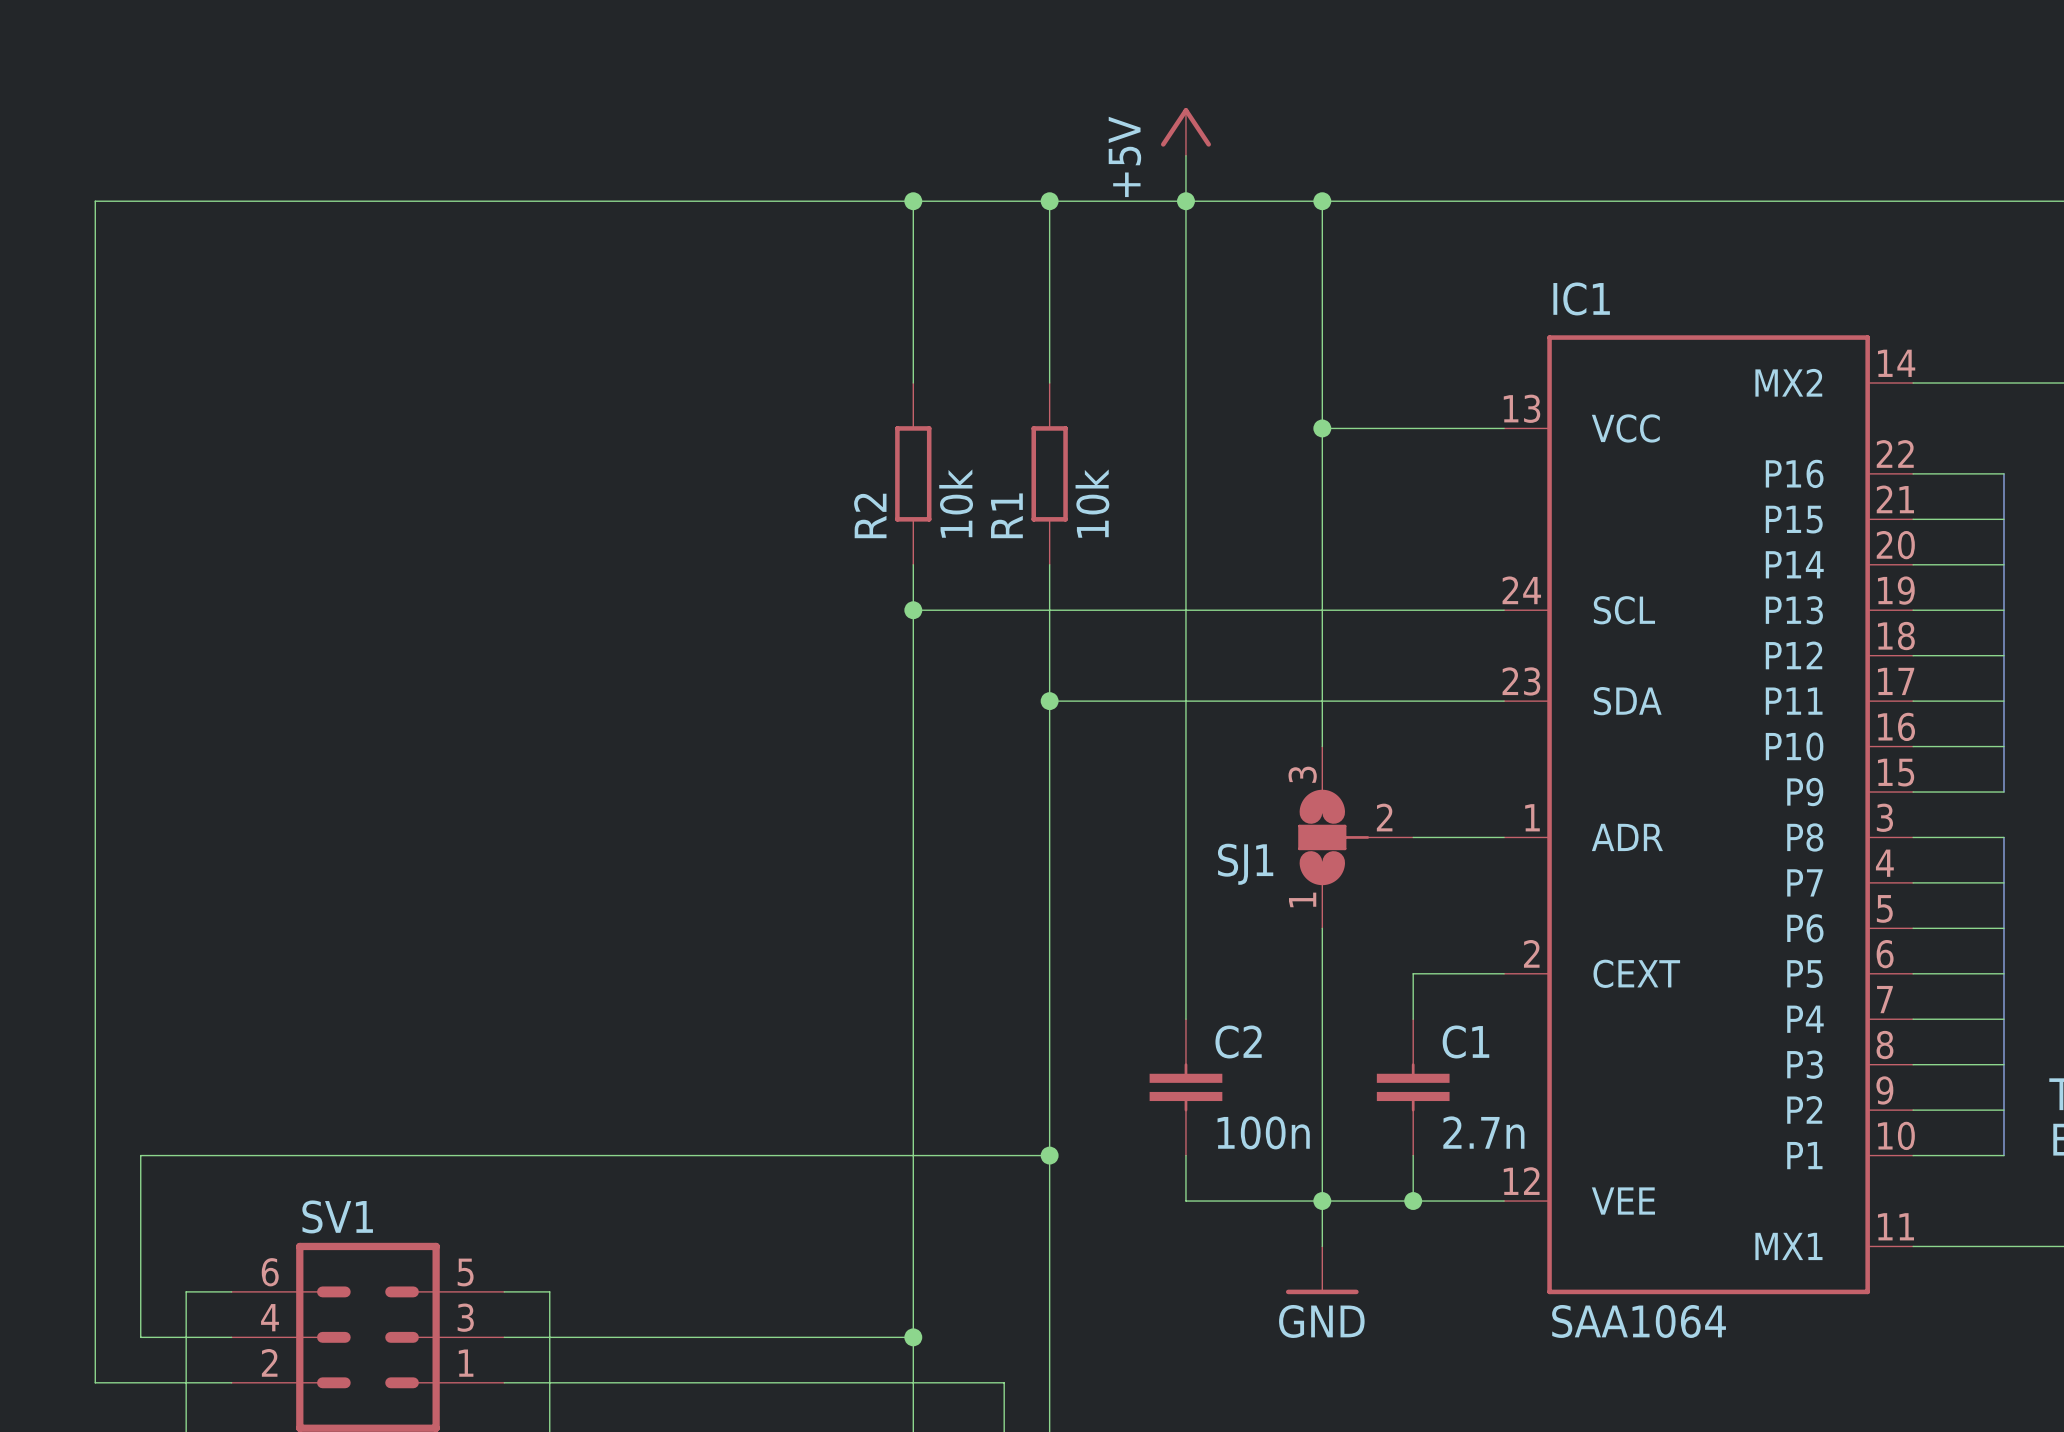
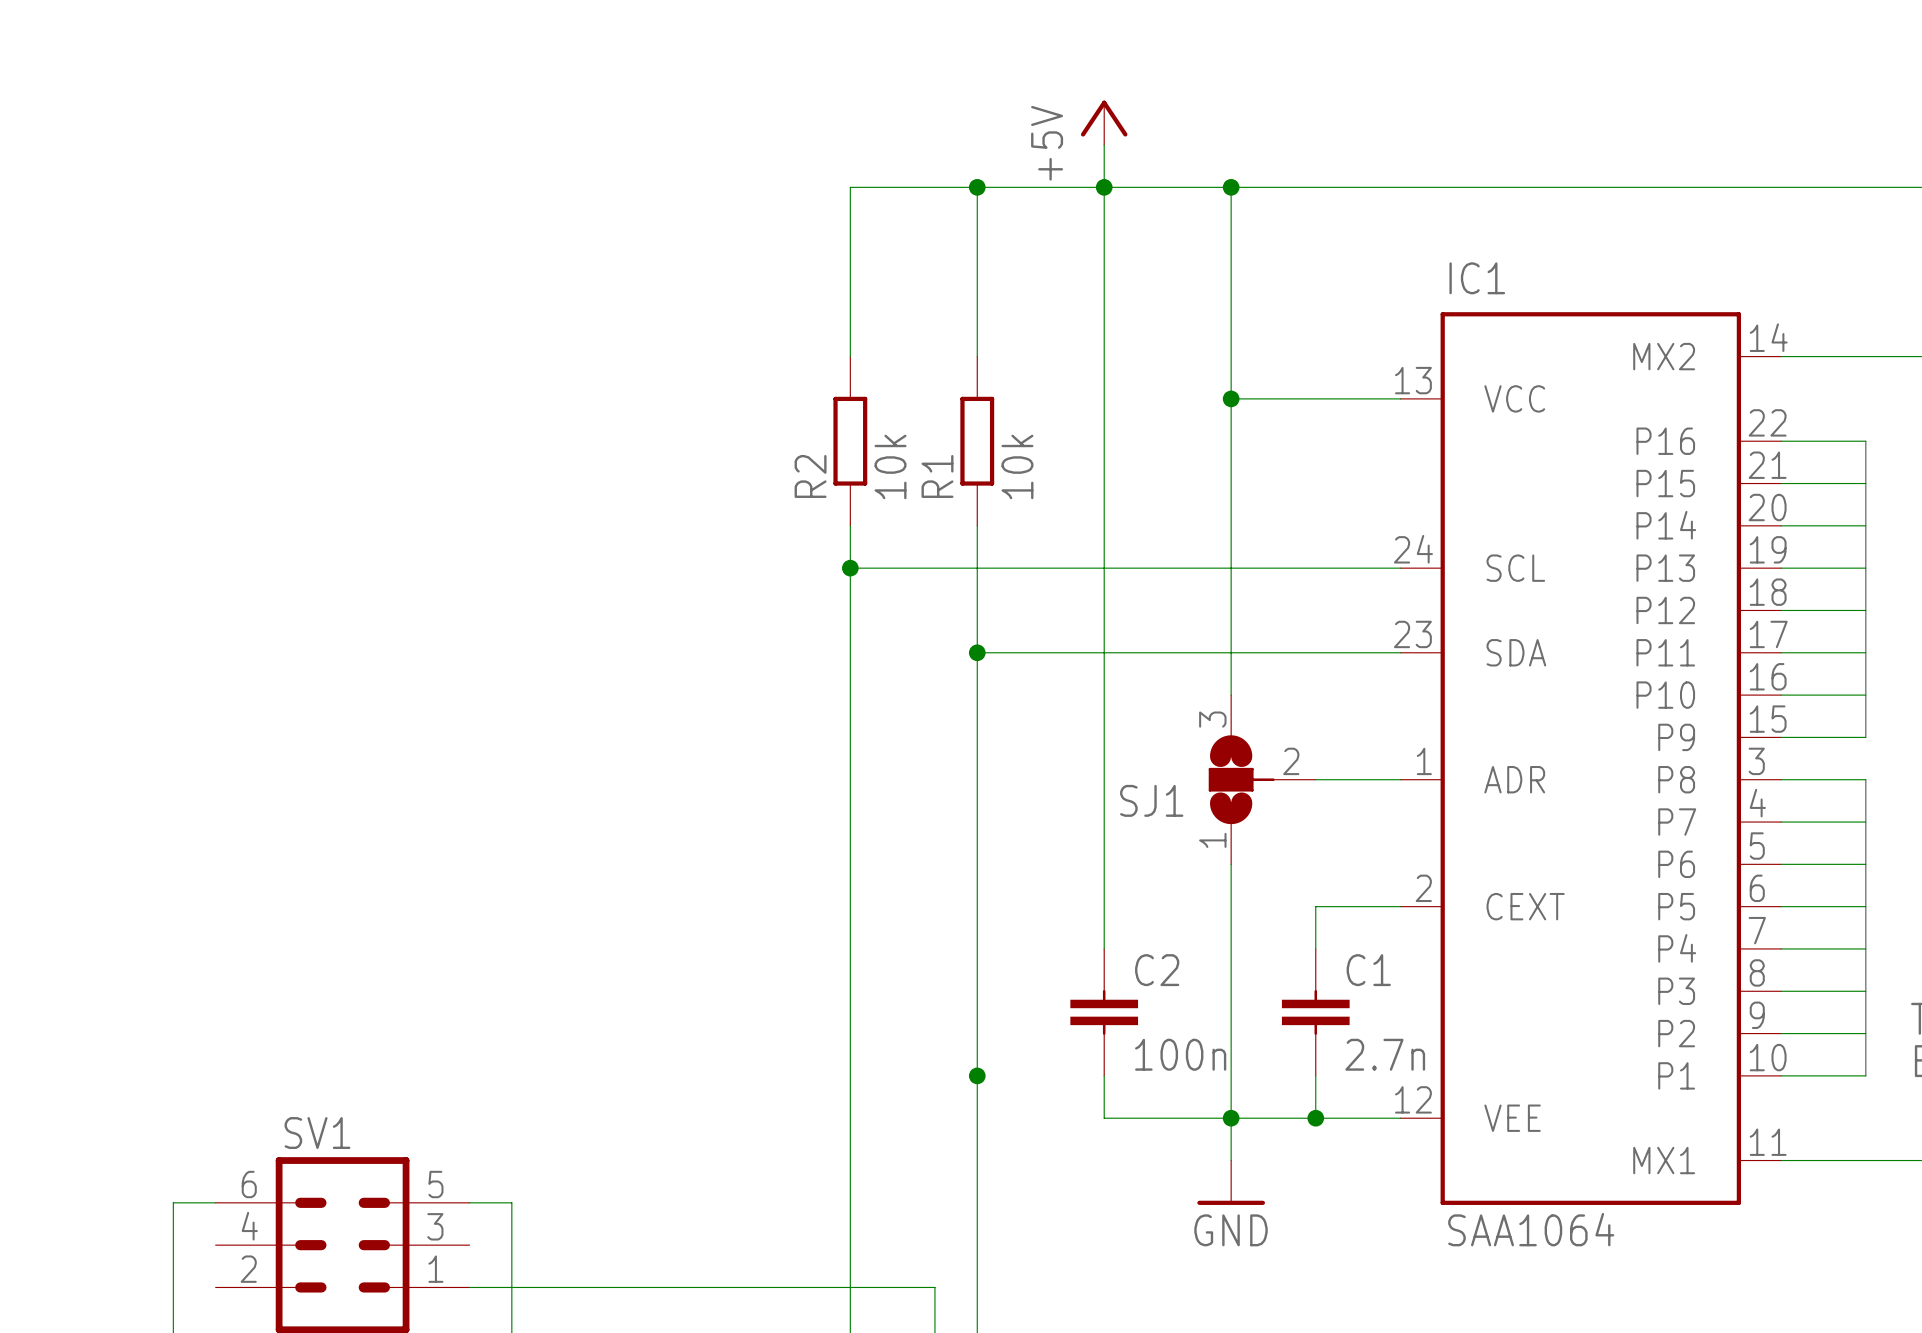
wire: (913, 201) (95, 201) (95, 1382) (231, 1382) -> none
junction: (913, 201) -> none
wire: (1049, 1155) (140, 1155) (140, 1337) (231, 1337) -> none
wire: (504, 1337) (913, 1337) -> none
junction: (913, 1337) -> none

